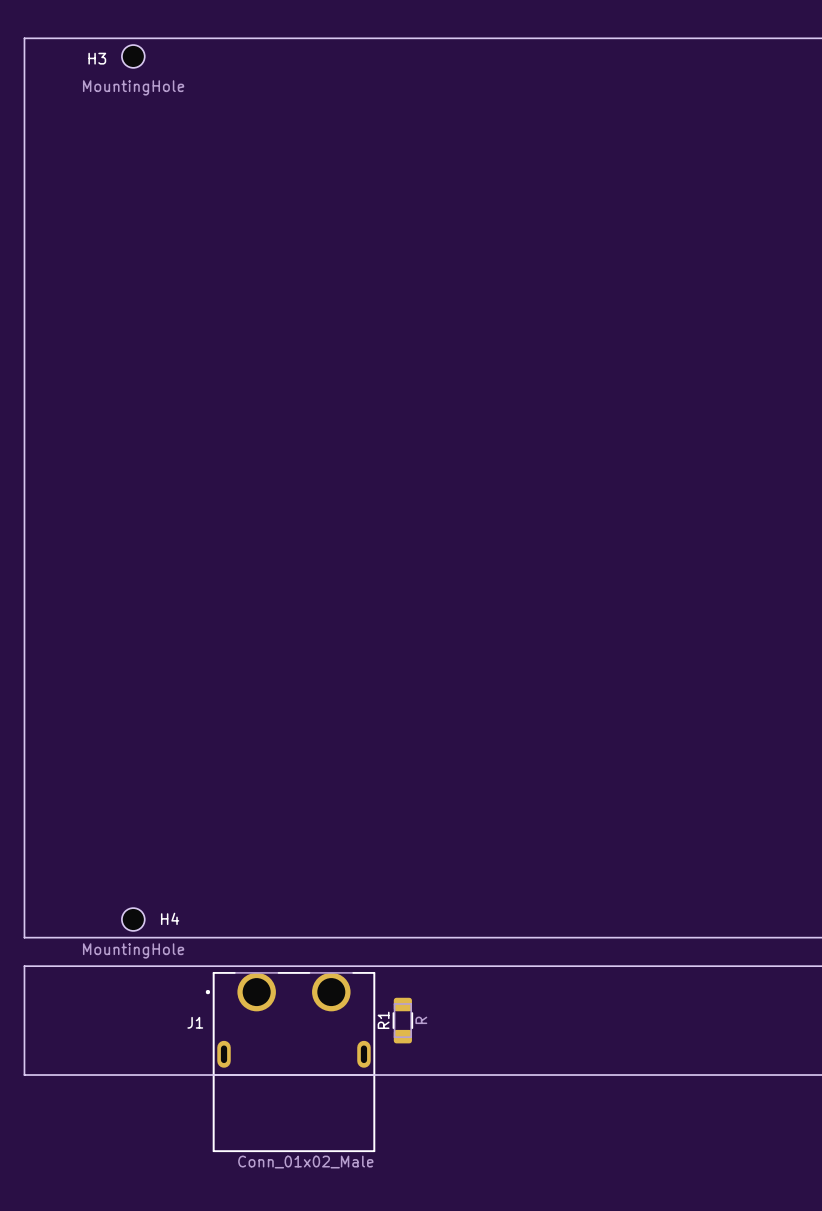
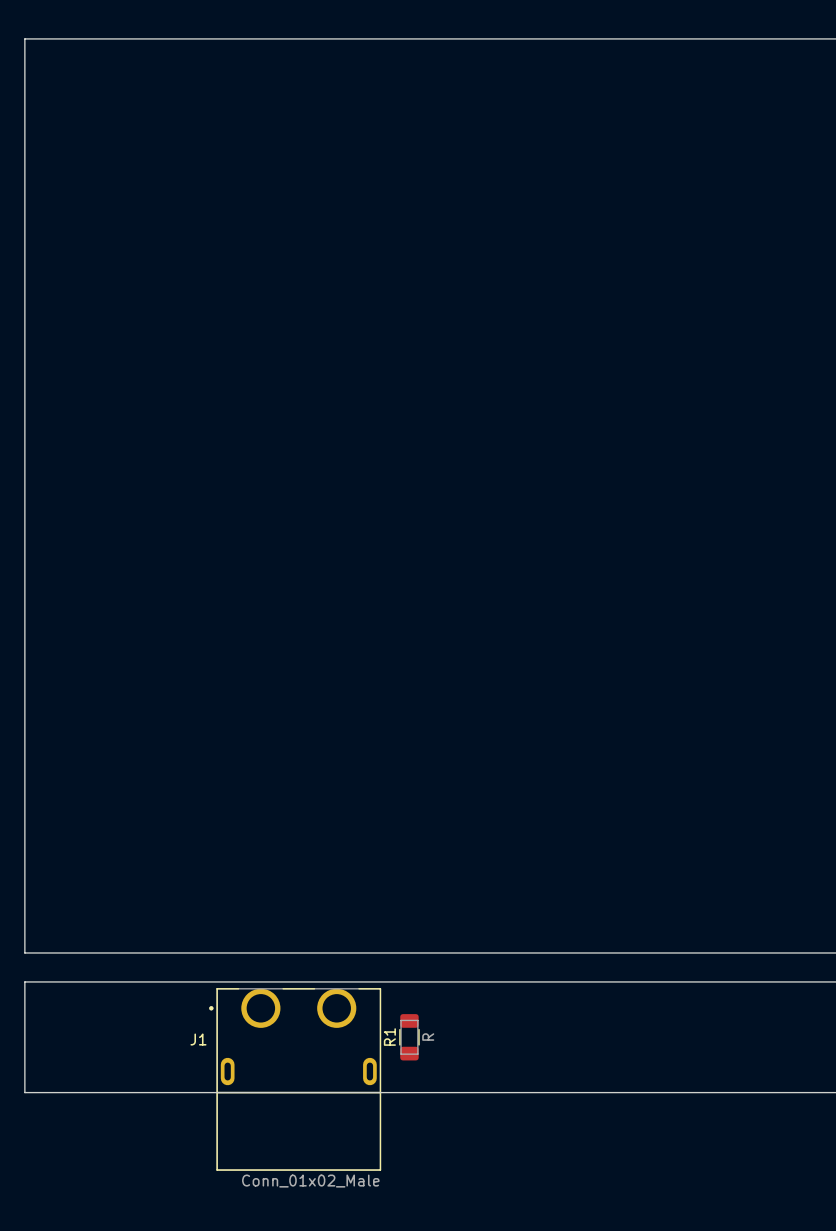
H3: MountingHole (133, 56) -> none
H4: MountingHole (133, 919) -> none

